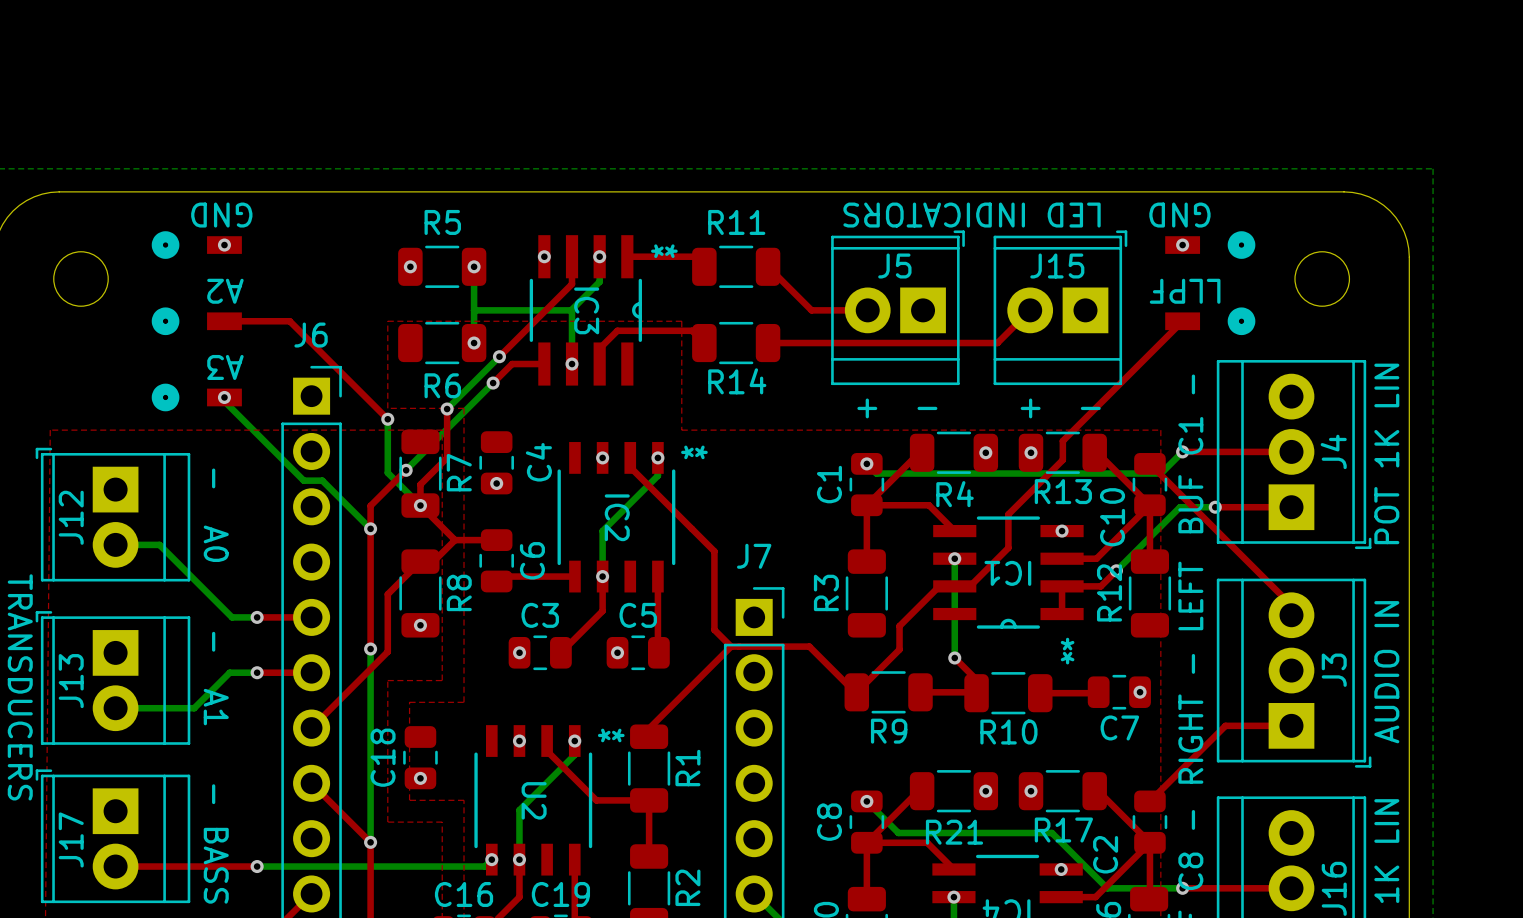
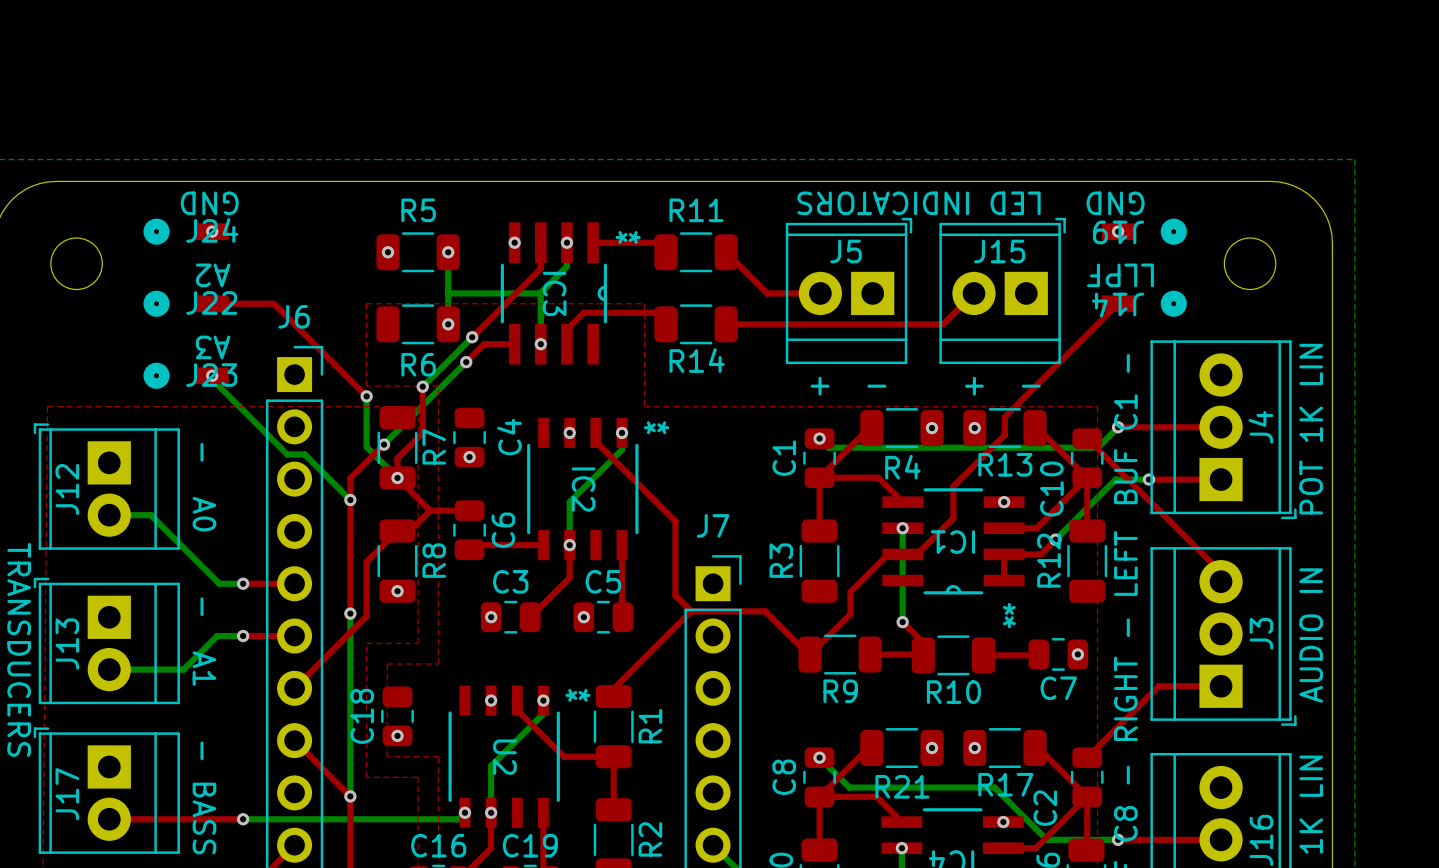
J24 name: none -> J24 (212, 230)
J19 name: none -> J19 (1118, 232)
J22 name: none -> J22 (211, 302)
J14 name: none -> J14 (1118, 304)
J23 name: none -> J23 (211, 375)

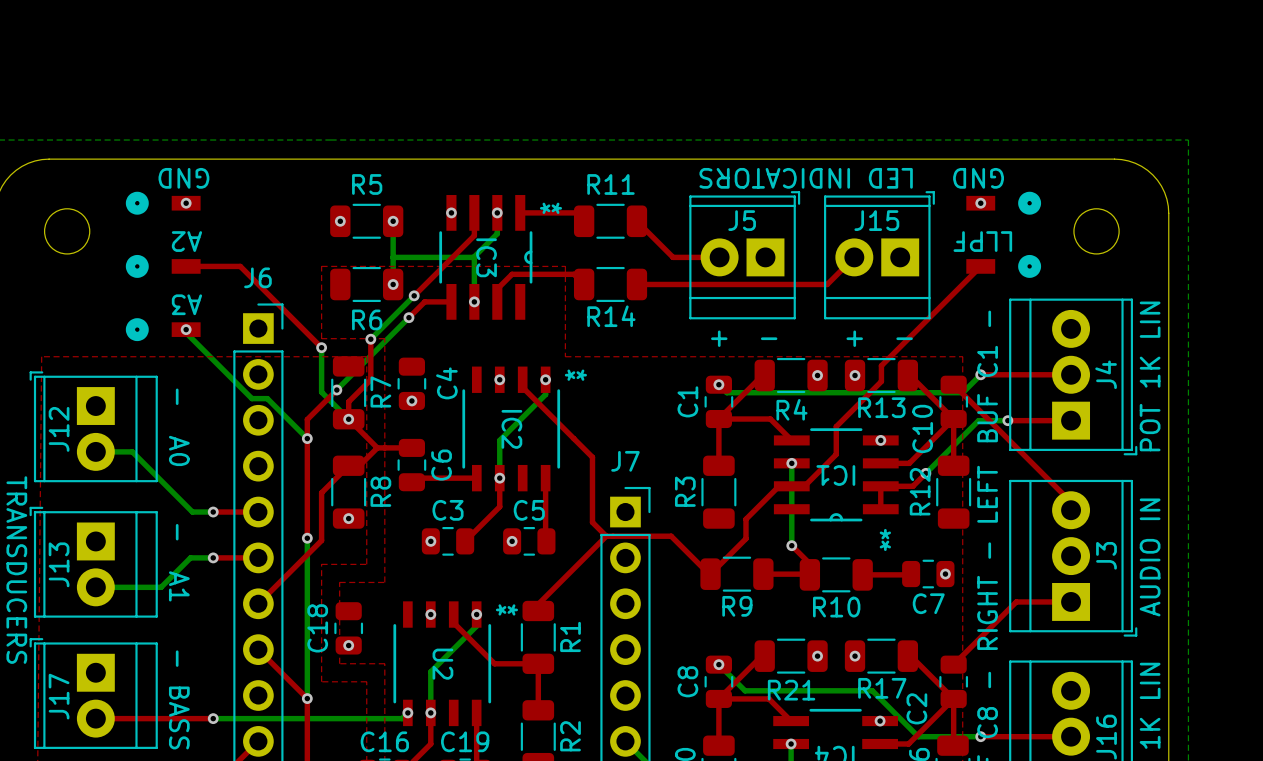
J24 name: J24 (212, 230) -> none
J19 name: J19 (1118, 232) -> none
J22 name: J22 (211, 302) -> none
J14 name: J14 (1118, 304) -> none
J23 name: J23 (211, 375) -> none

